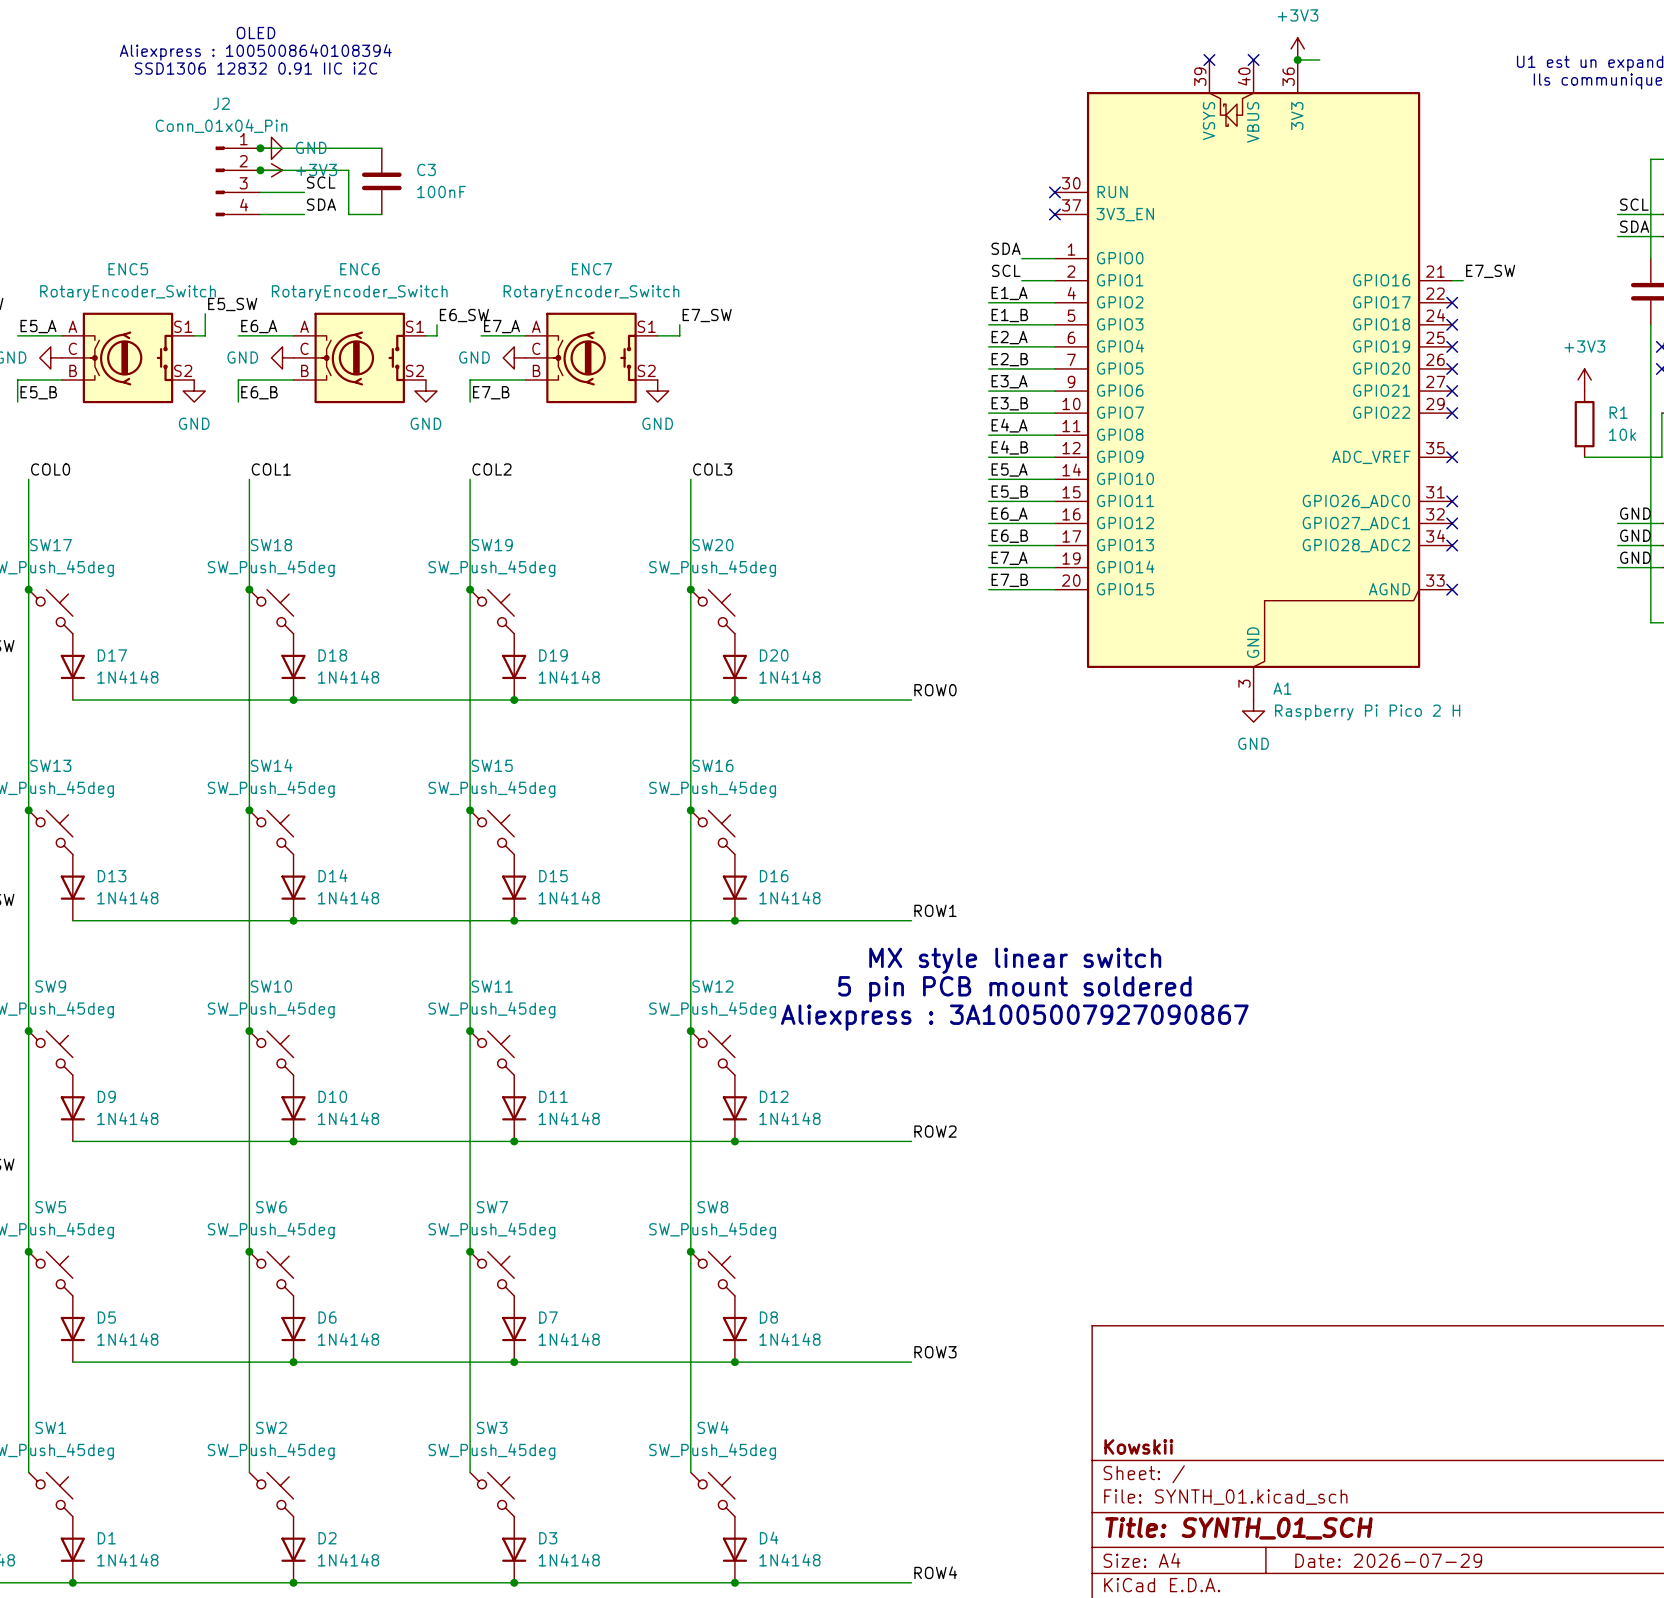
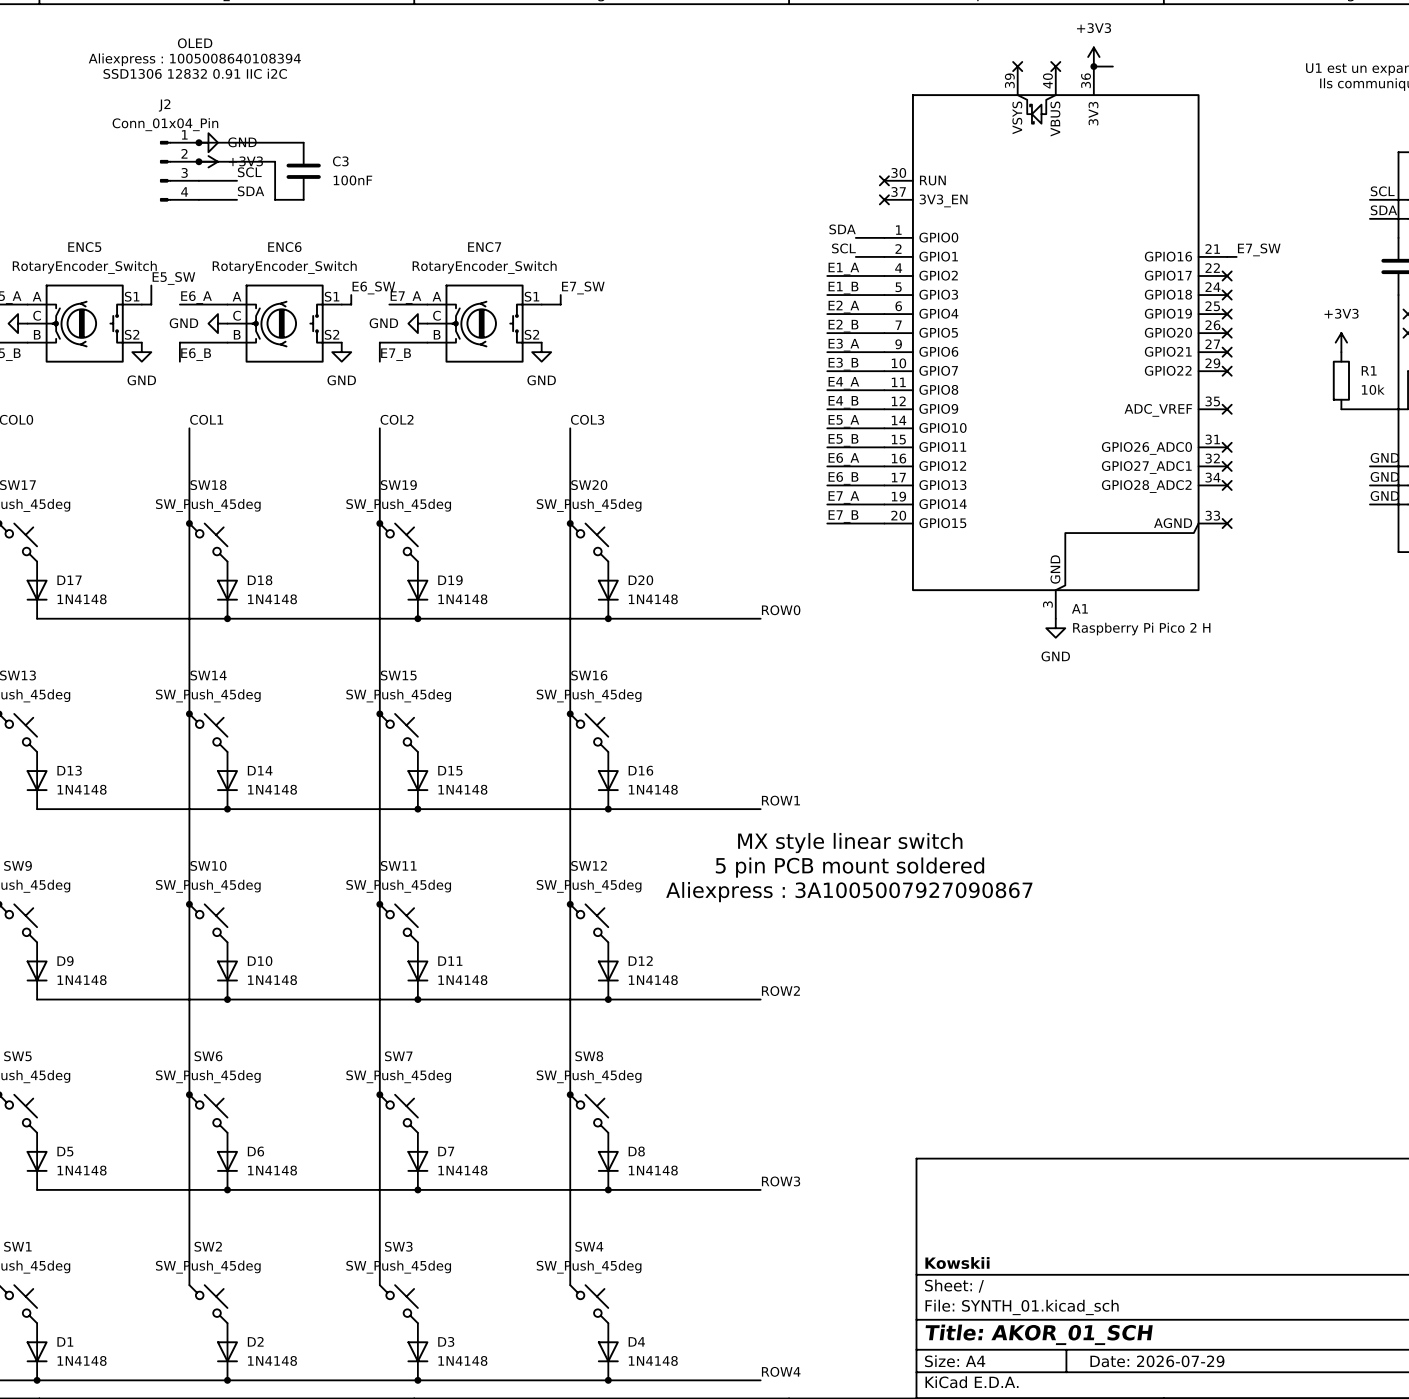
title block: Title: SYNTH_01_SCH (1238, 1528) -> Title: AKOR_01_SCH (1039, 1334)

